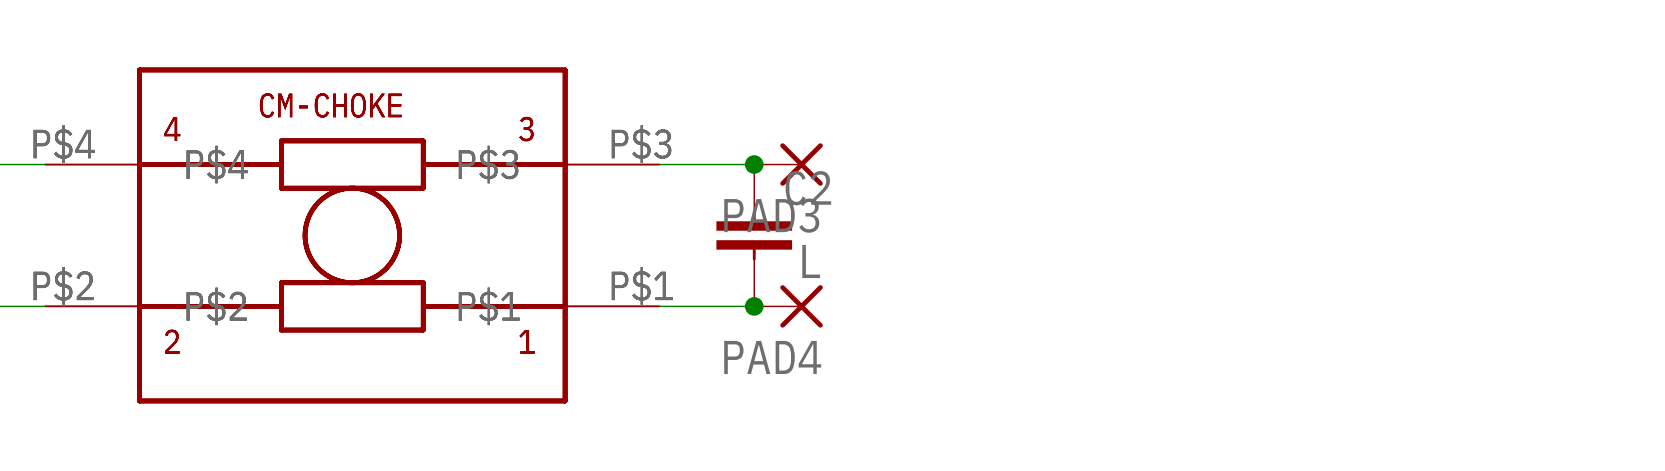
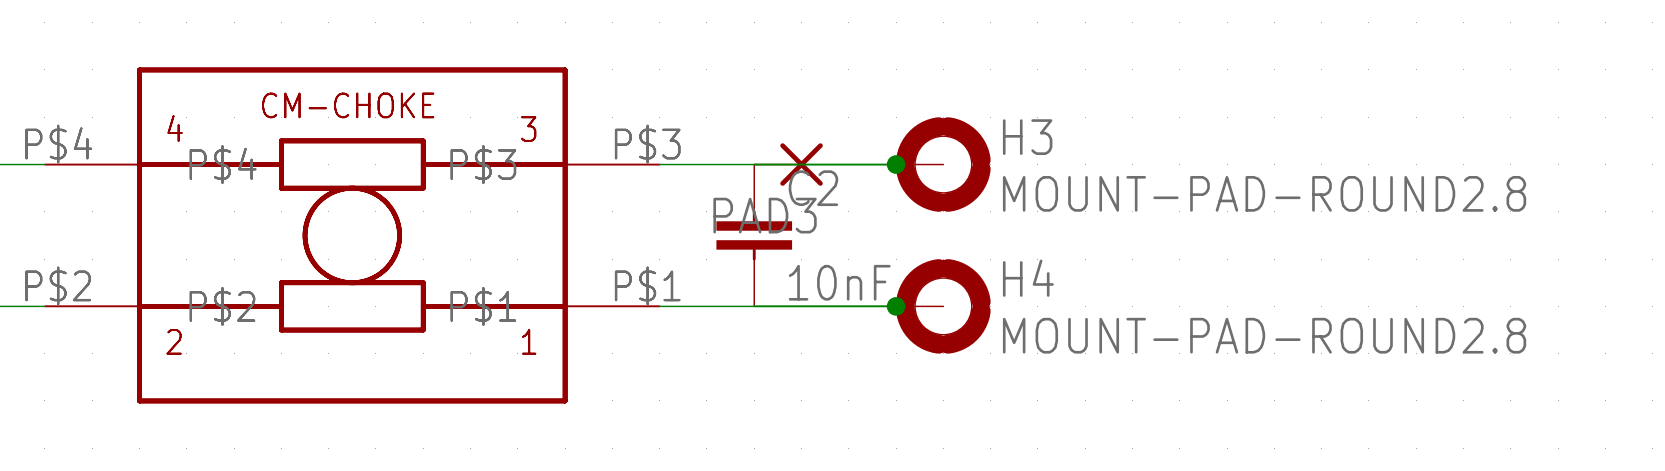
wire: none -> (754, 164) (896, 164)
junction: (754, 164) -> none
junction: none -> (896, 164)
H3: none -> MOUNT-PAD-ROUND2.8 (943, 164)
C2 value: none -> 10nF (839, 282)
wire: none -> (754, 306) (896, 306)
junction: (754, 306) -> none
PAD4: L (788, 306) -> none
junction: none -> (896, 306)
H4: none -> MOUNT-PAD-ROUND2.8 (943, 306)

